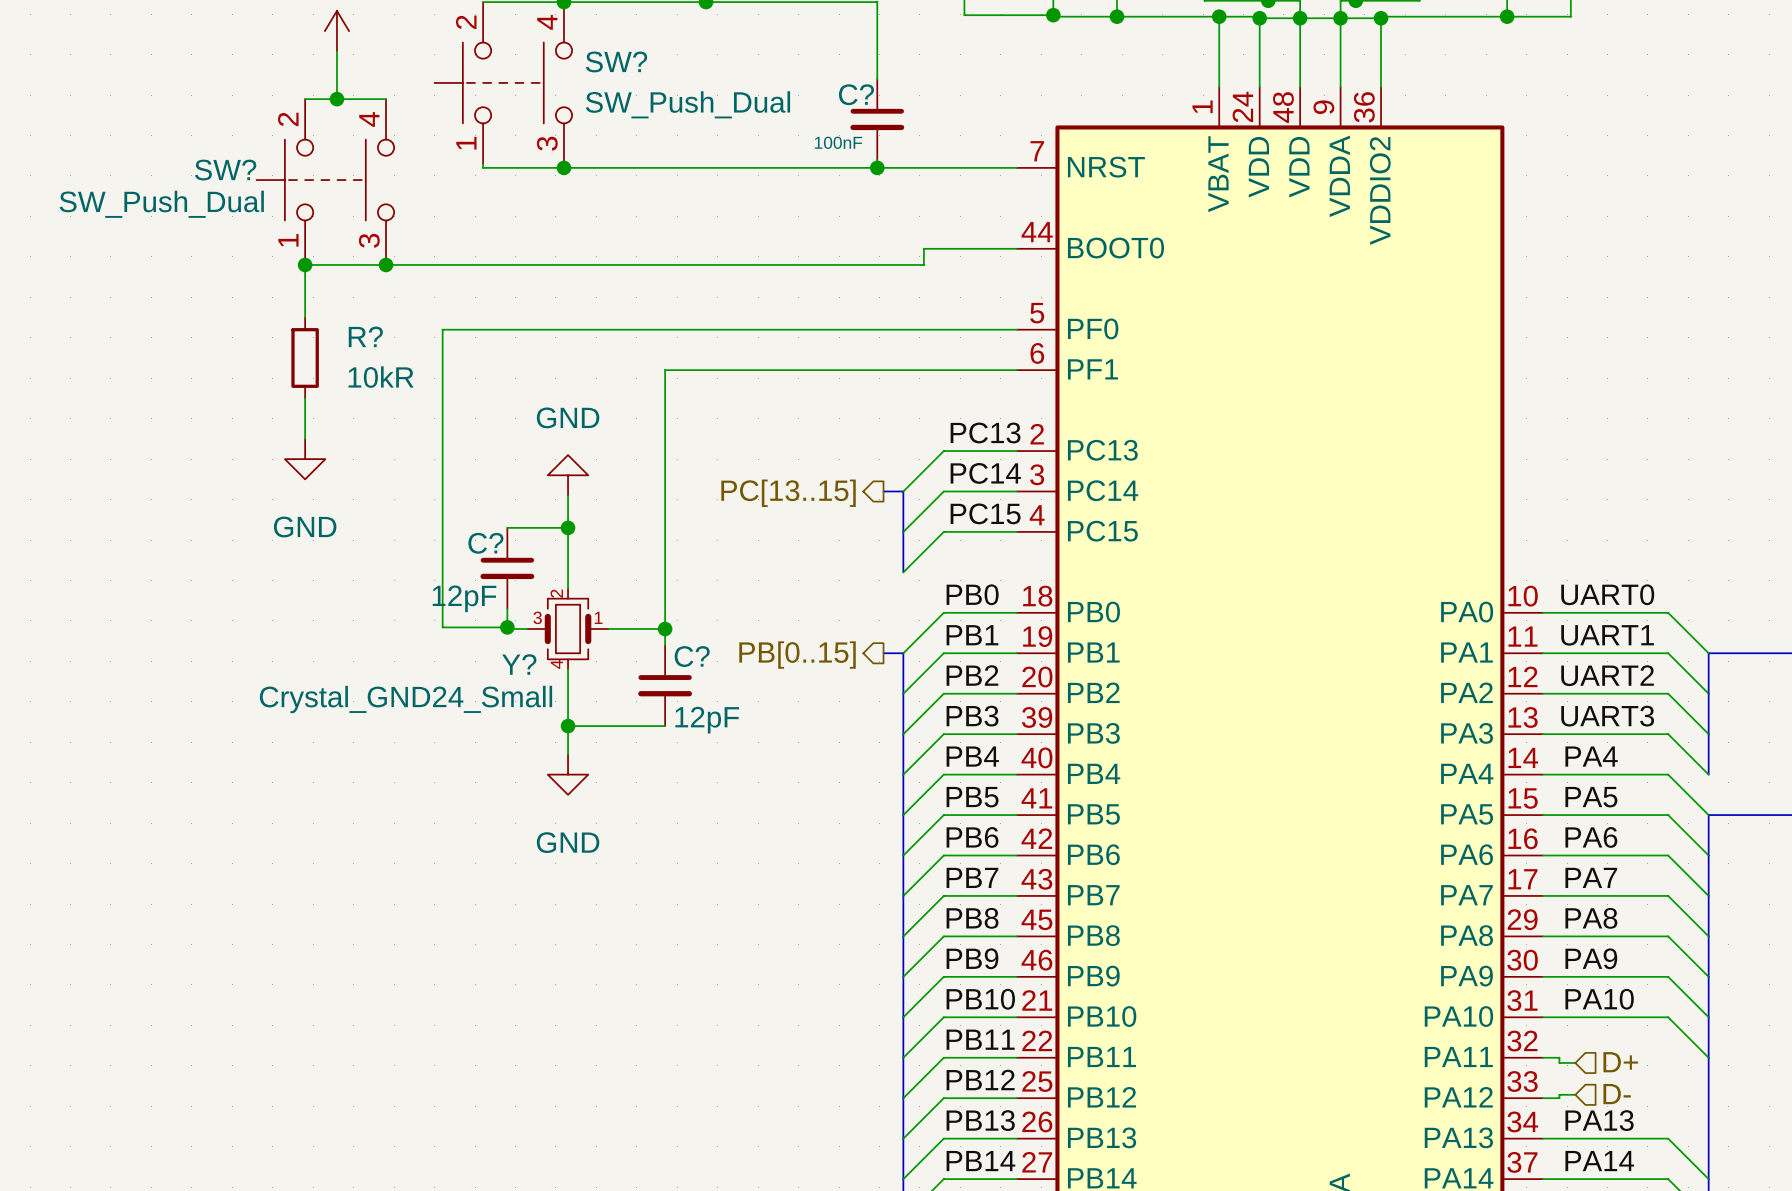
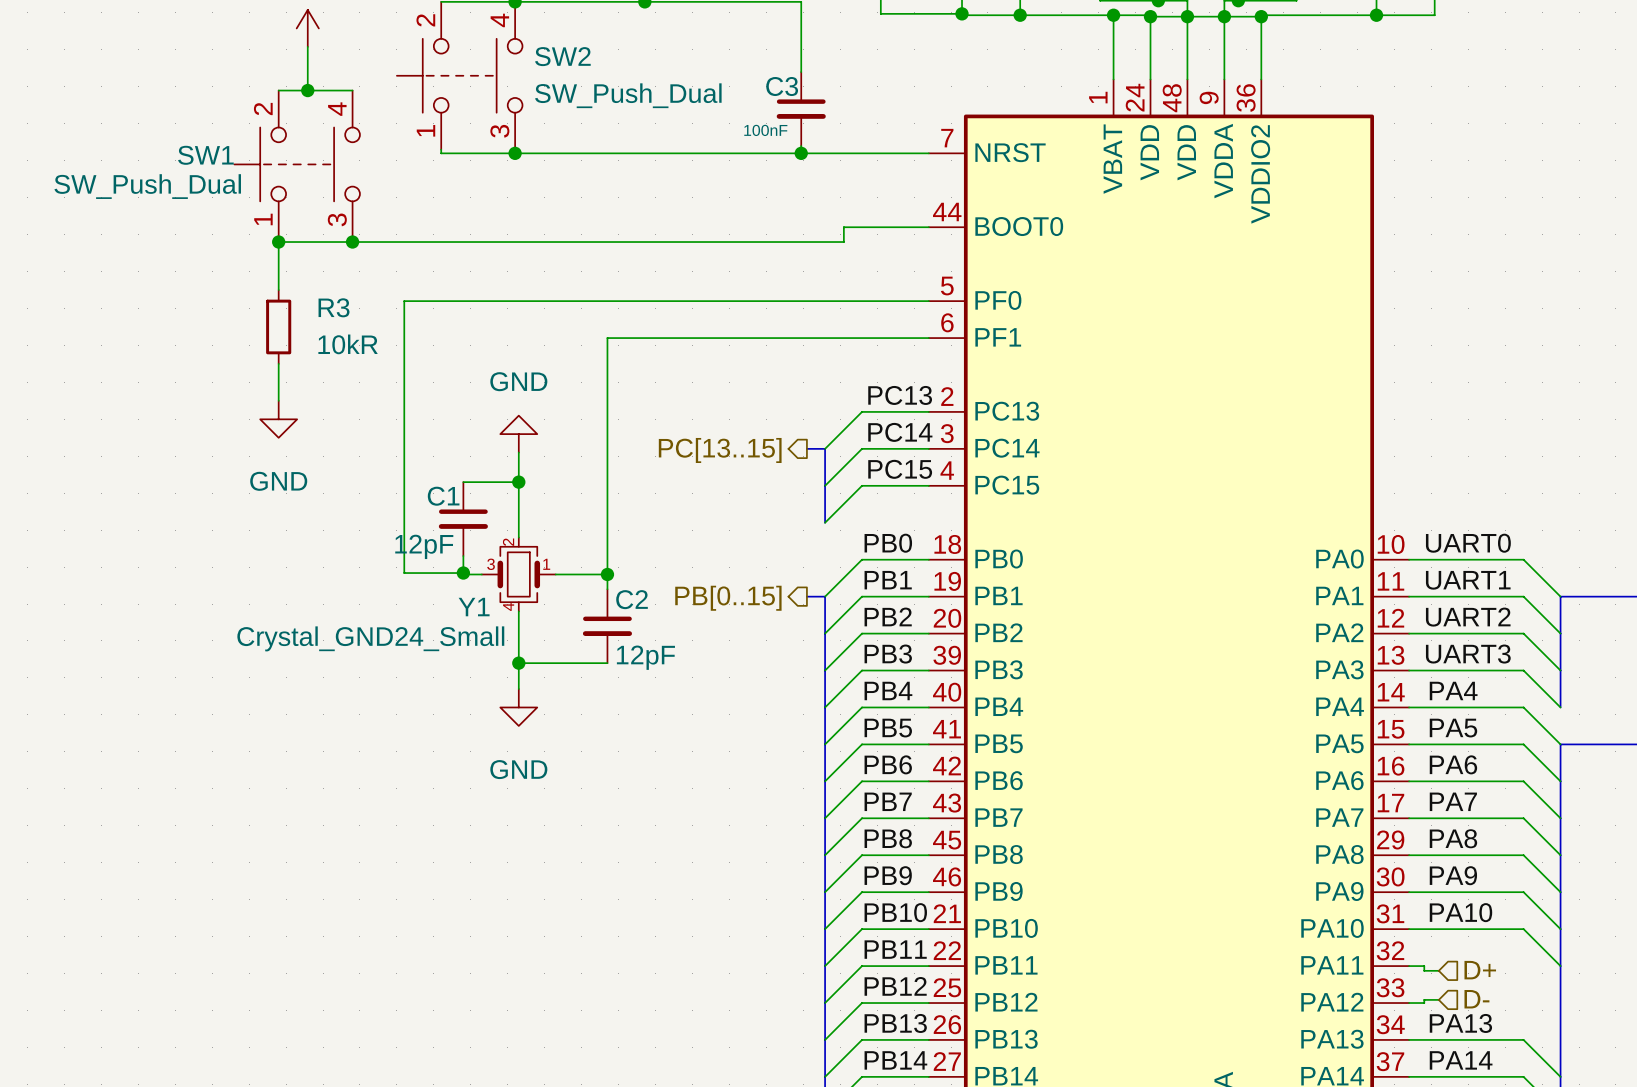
SW? name: SW? (616, 61) -> SW2 (562, 56)
C? name: C? (856, 94) -> C3 (782, 86)
SW? name: SW? (225, 170) -> SW1 (205, 155)
R? name: R? (365, 336) -> R3 (334, 307)
C? name: C? (485, 543) -> C1 (443, 496)
C? name: C? (692, 656) -> C2 (632, 599)
Y? name: Y? (519, 664) -> Y1 (474, 607)

